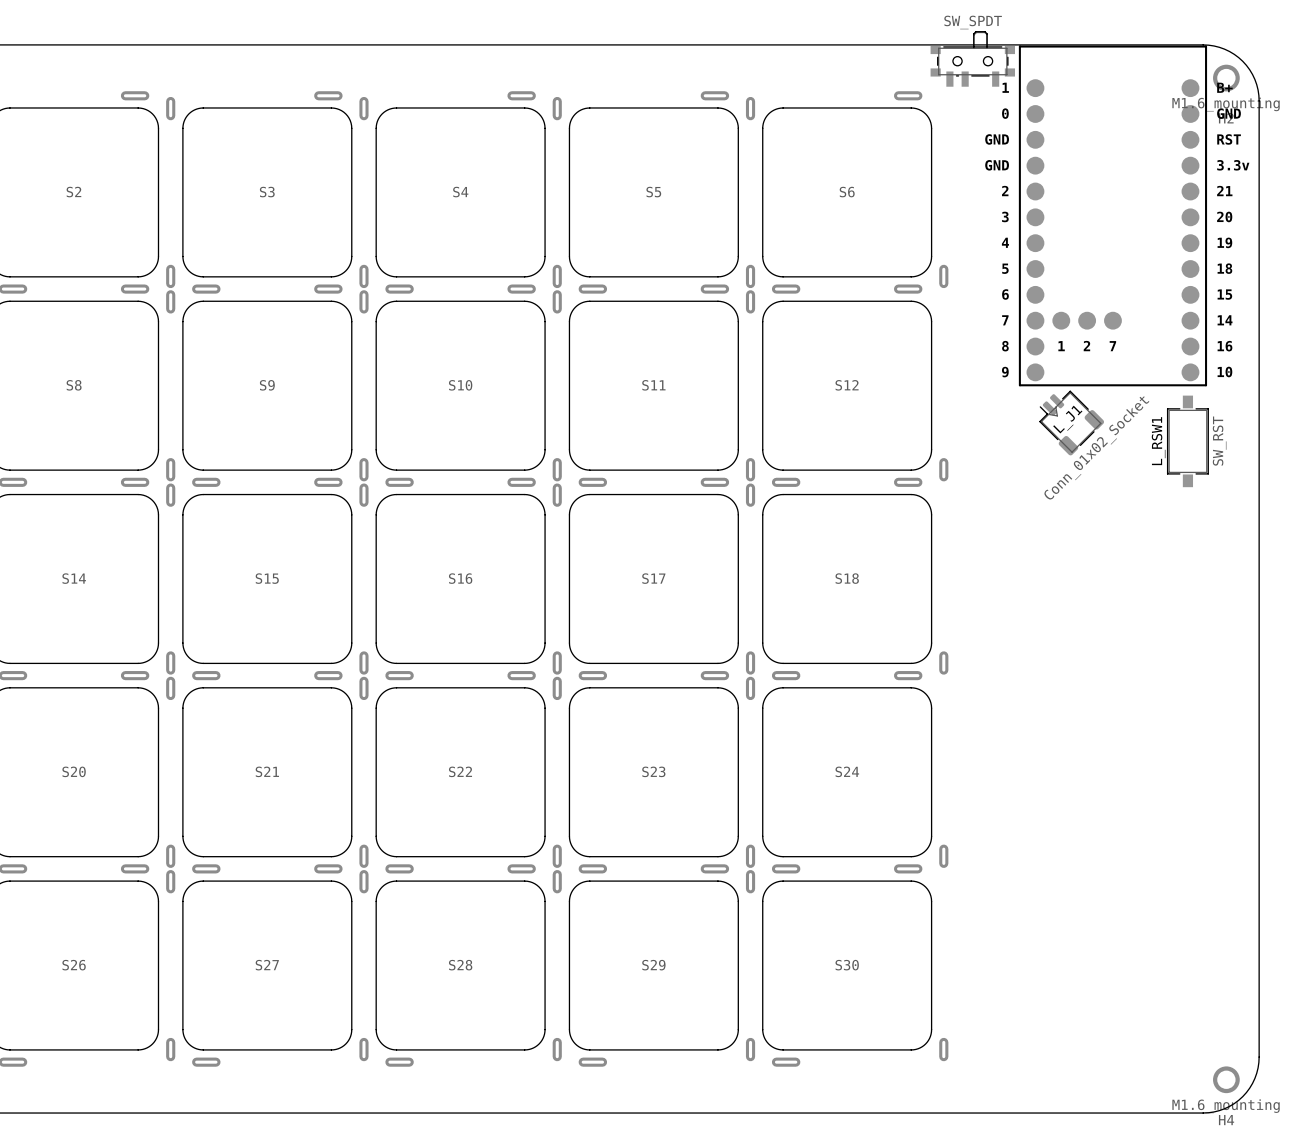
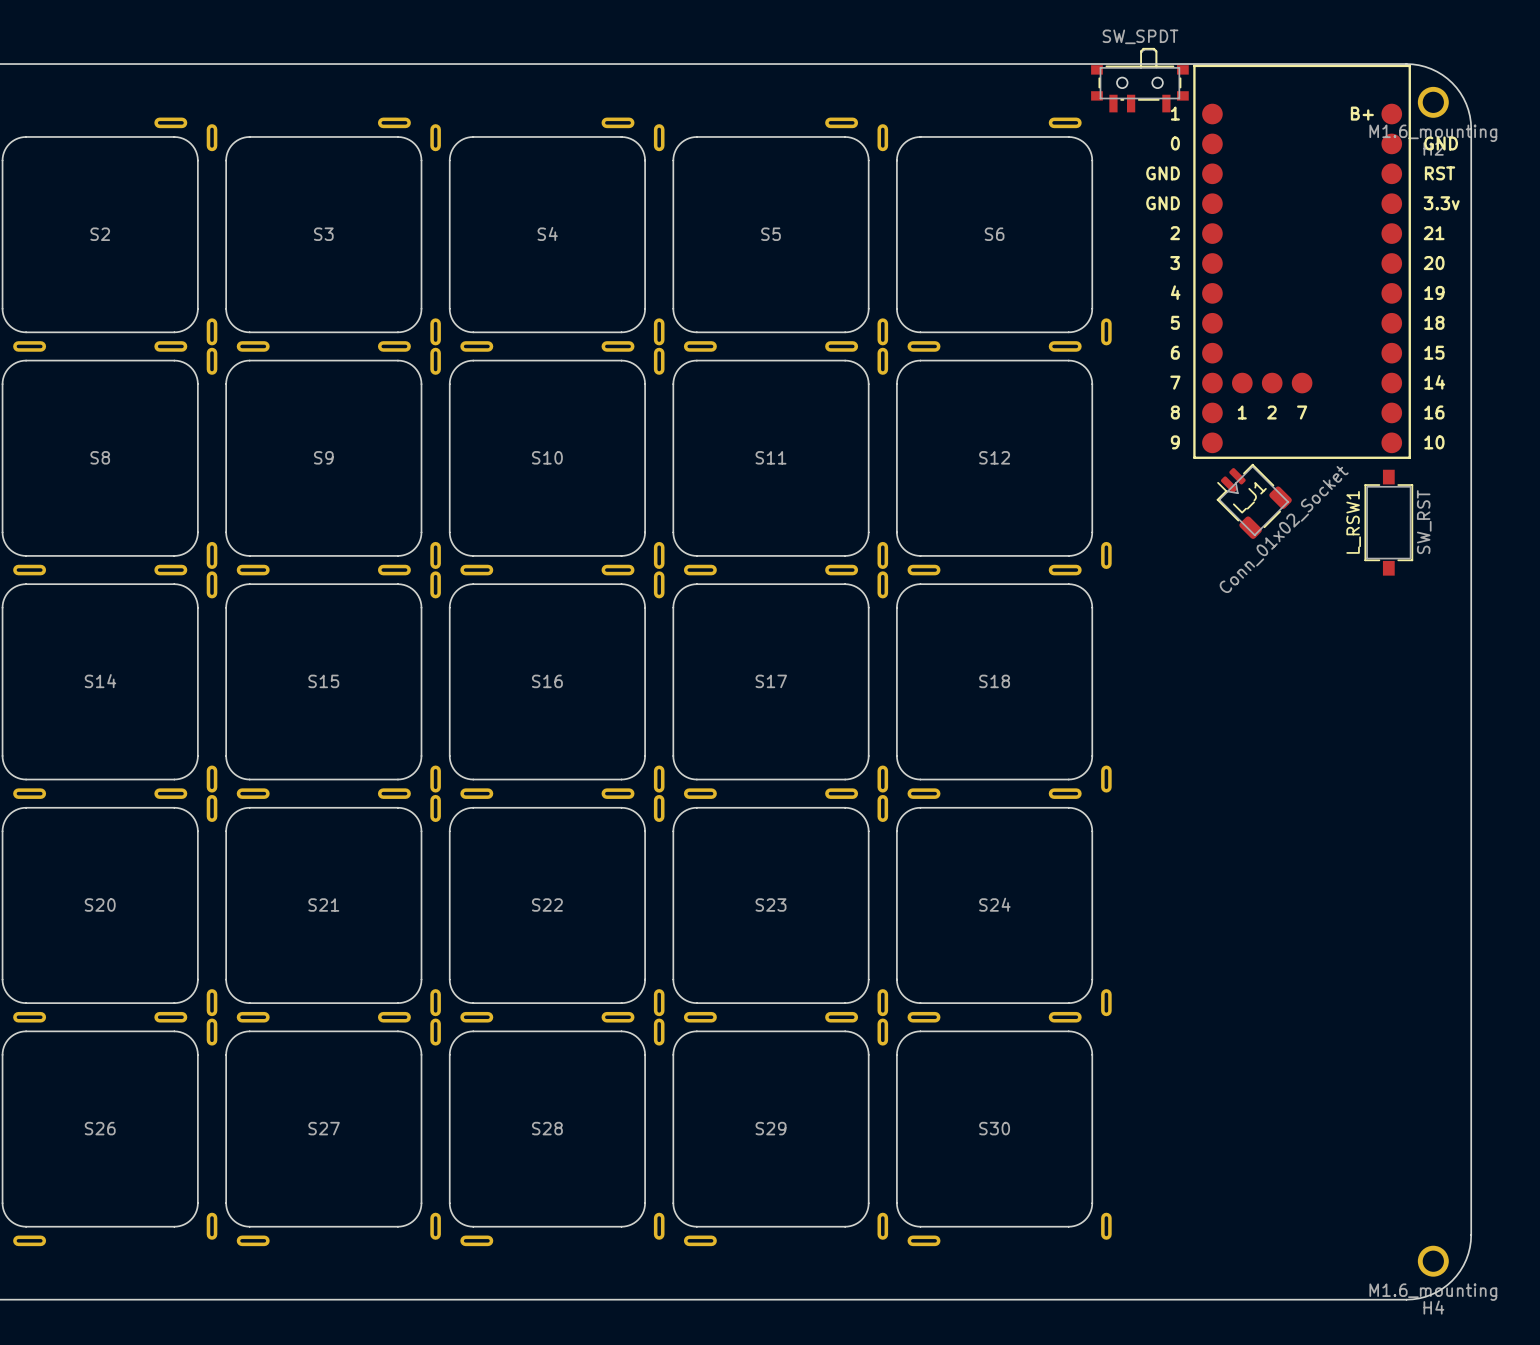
part text position: B+ (1224, 87) -> B+ (1362, 113)

